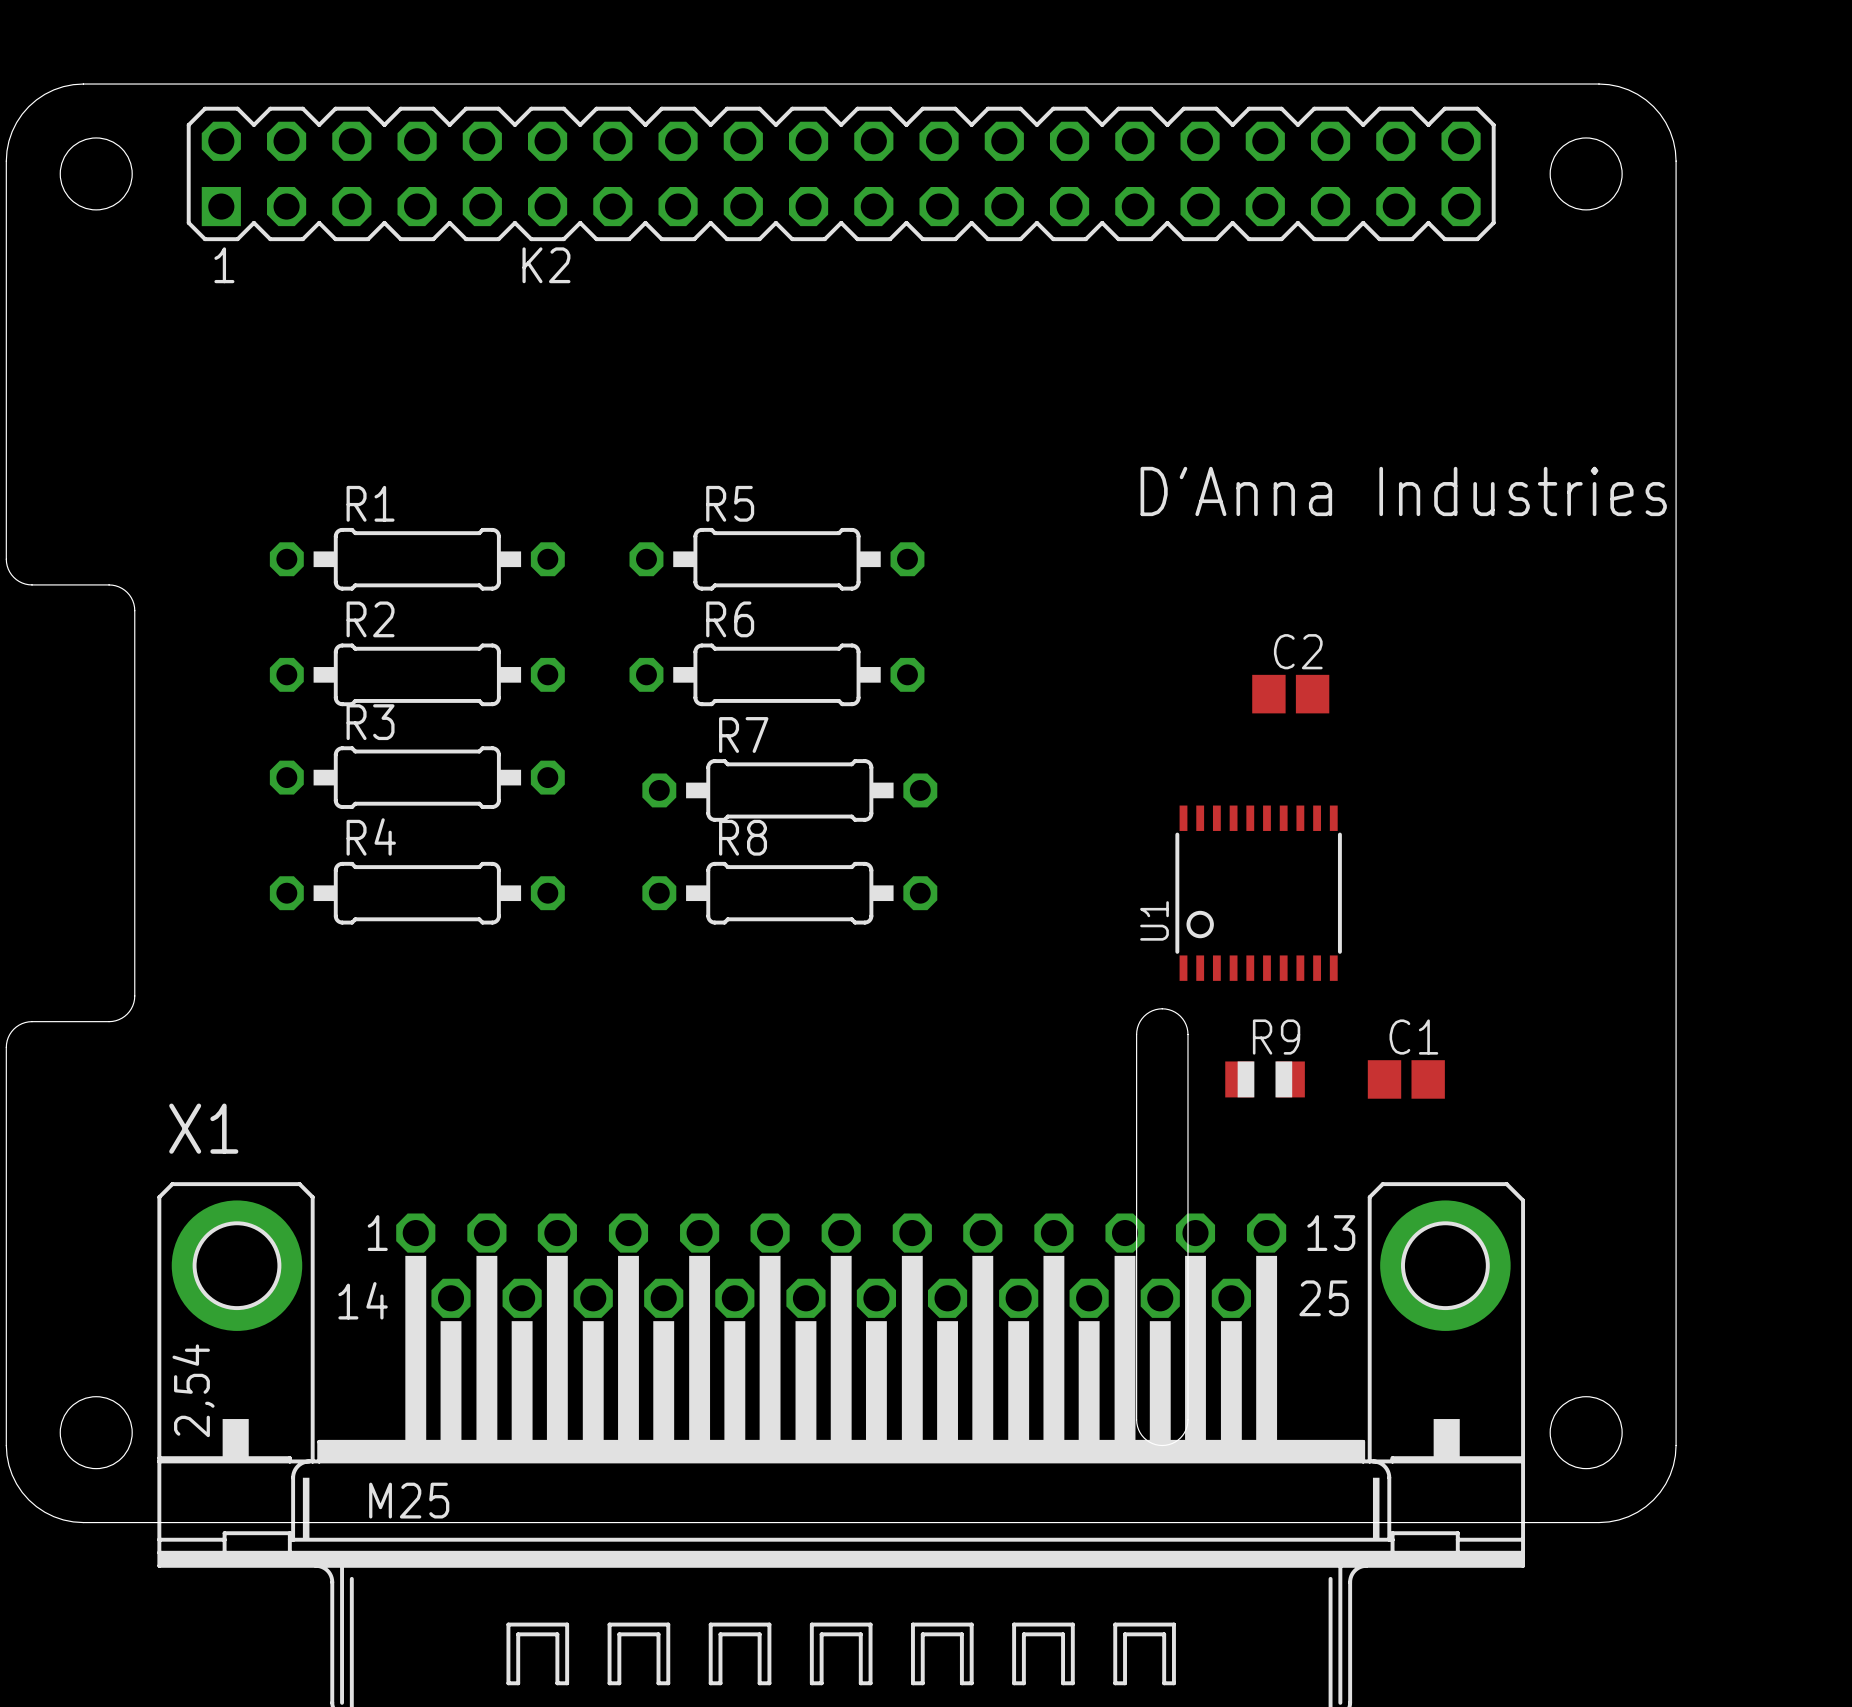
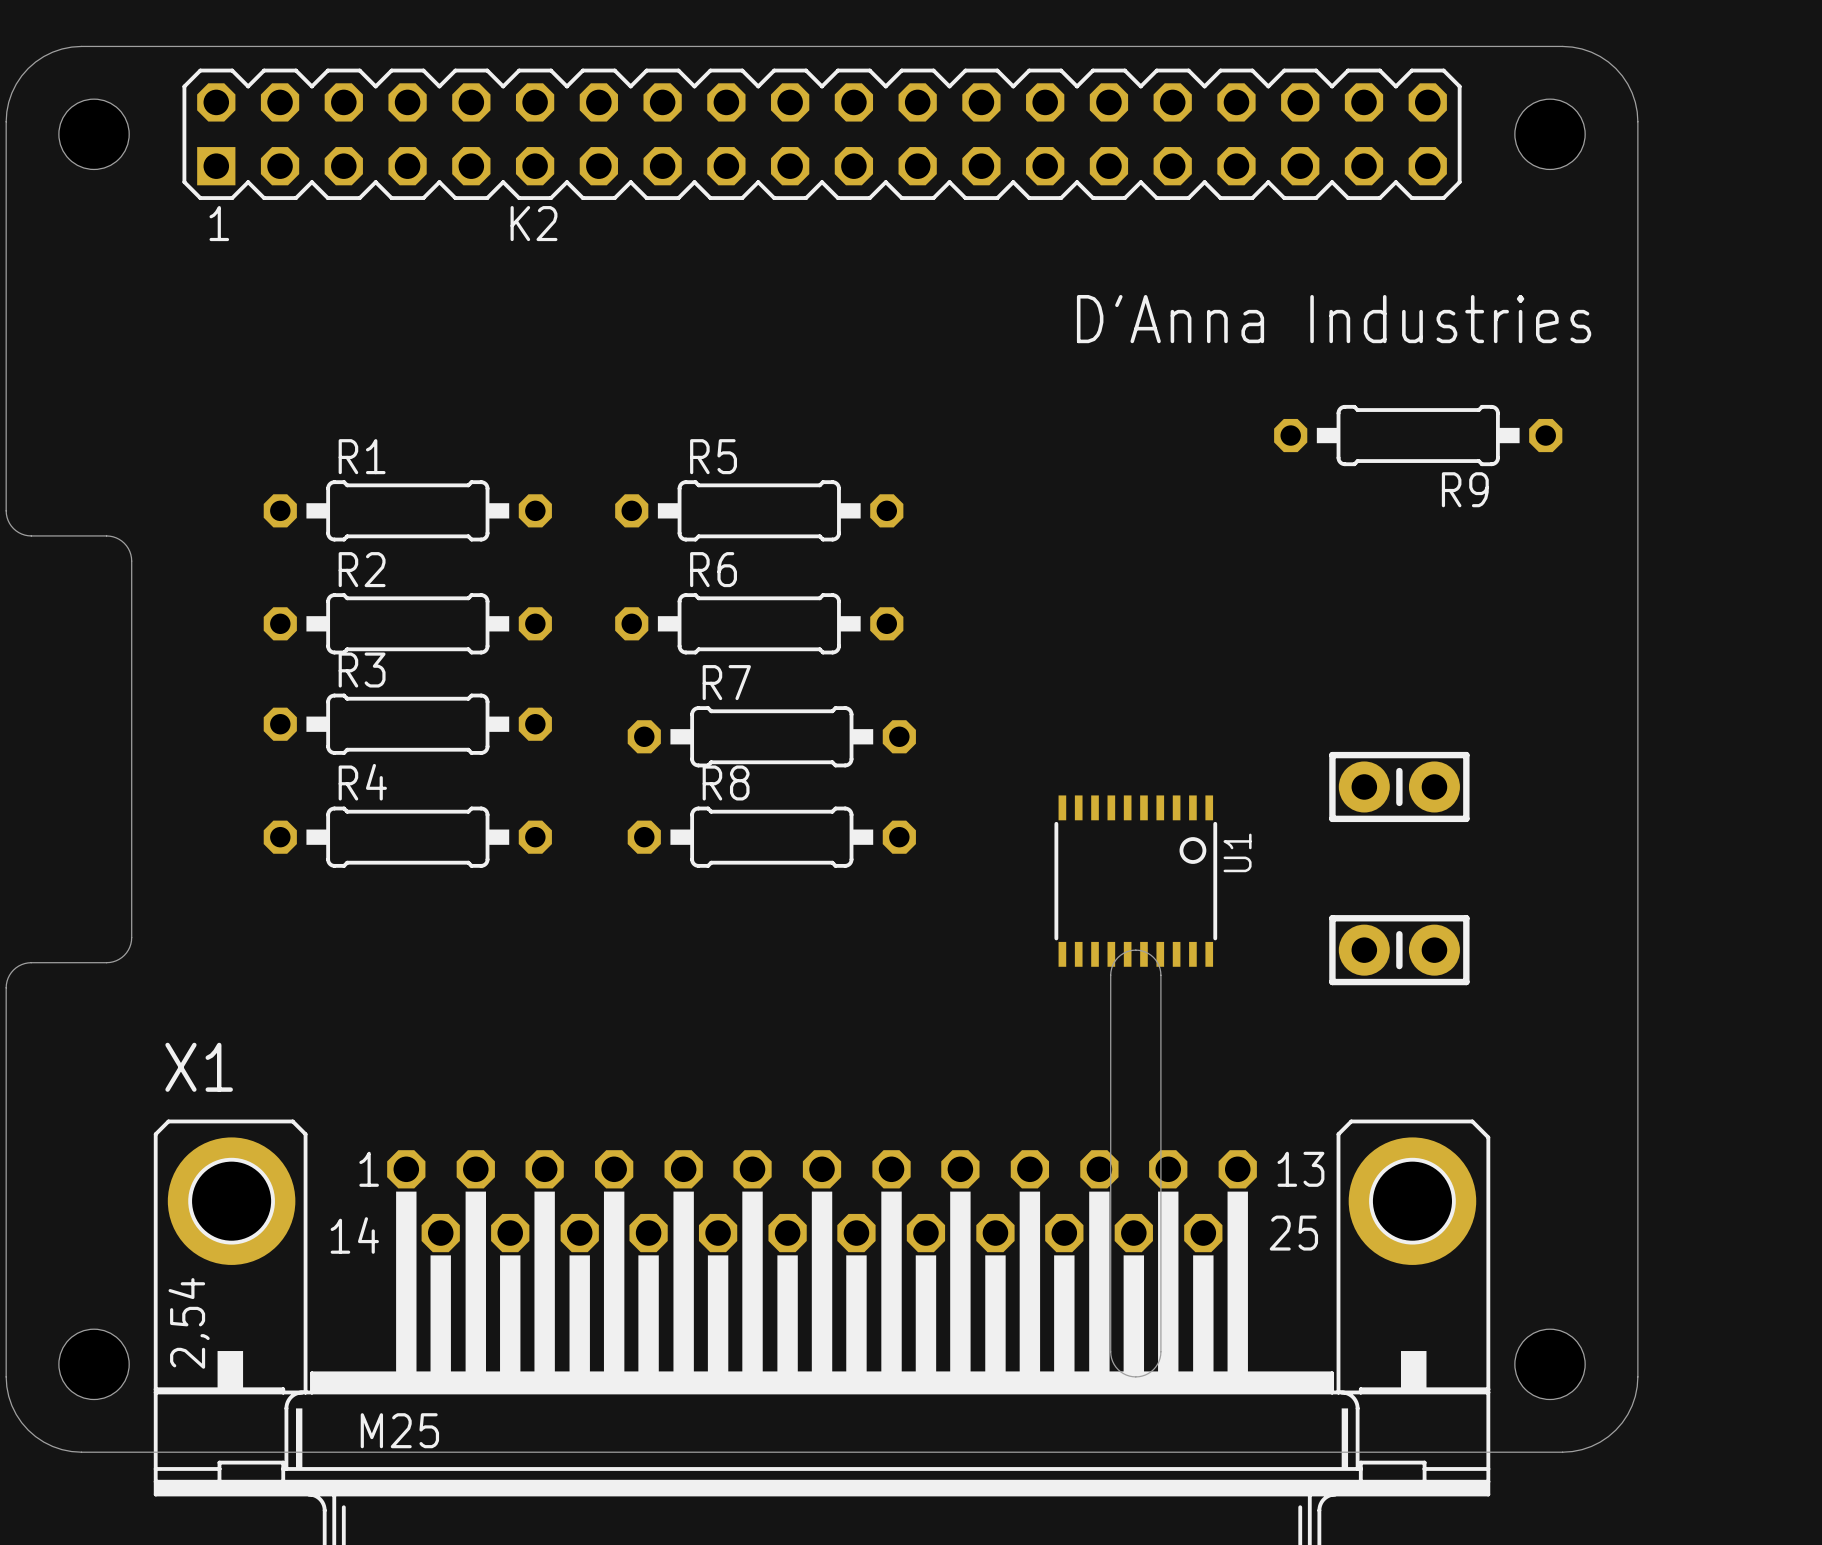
text position: D'Anna Industries (1403, 491) -> D'Anna Industries (1334, 319)
C2: (1290, 694) -> none
part: none -> (1399, 786)
U1 rotation: 0° (1258, 893) -> 180° (1135, 881)
U1 position: (1258, 893) -> (1135, 881)
part: none -> (1399, 950)
R9 name position: R9 (1276, 1037) -> R9 (1465, 489)
R9 footprint: [1225, 1061, 1305, 1098] -> [1274, 404, 1563, 467]
C1: (1406, 1079) -> none

